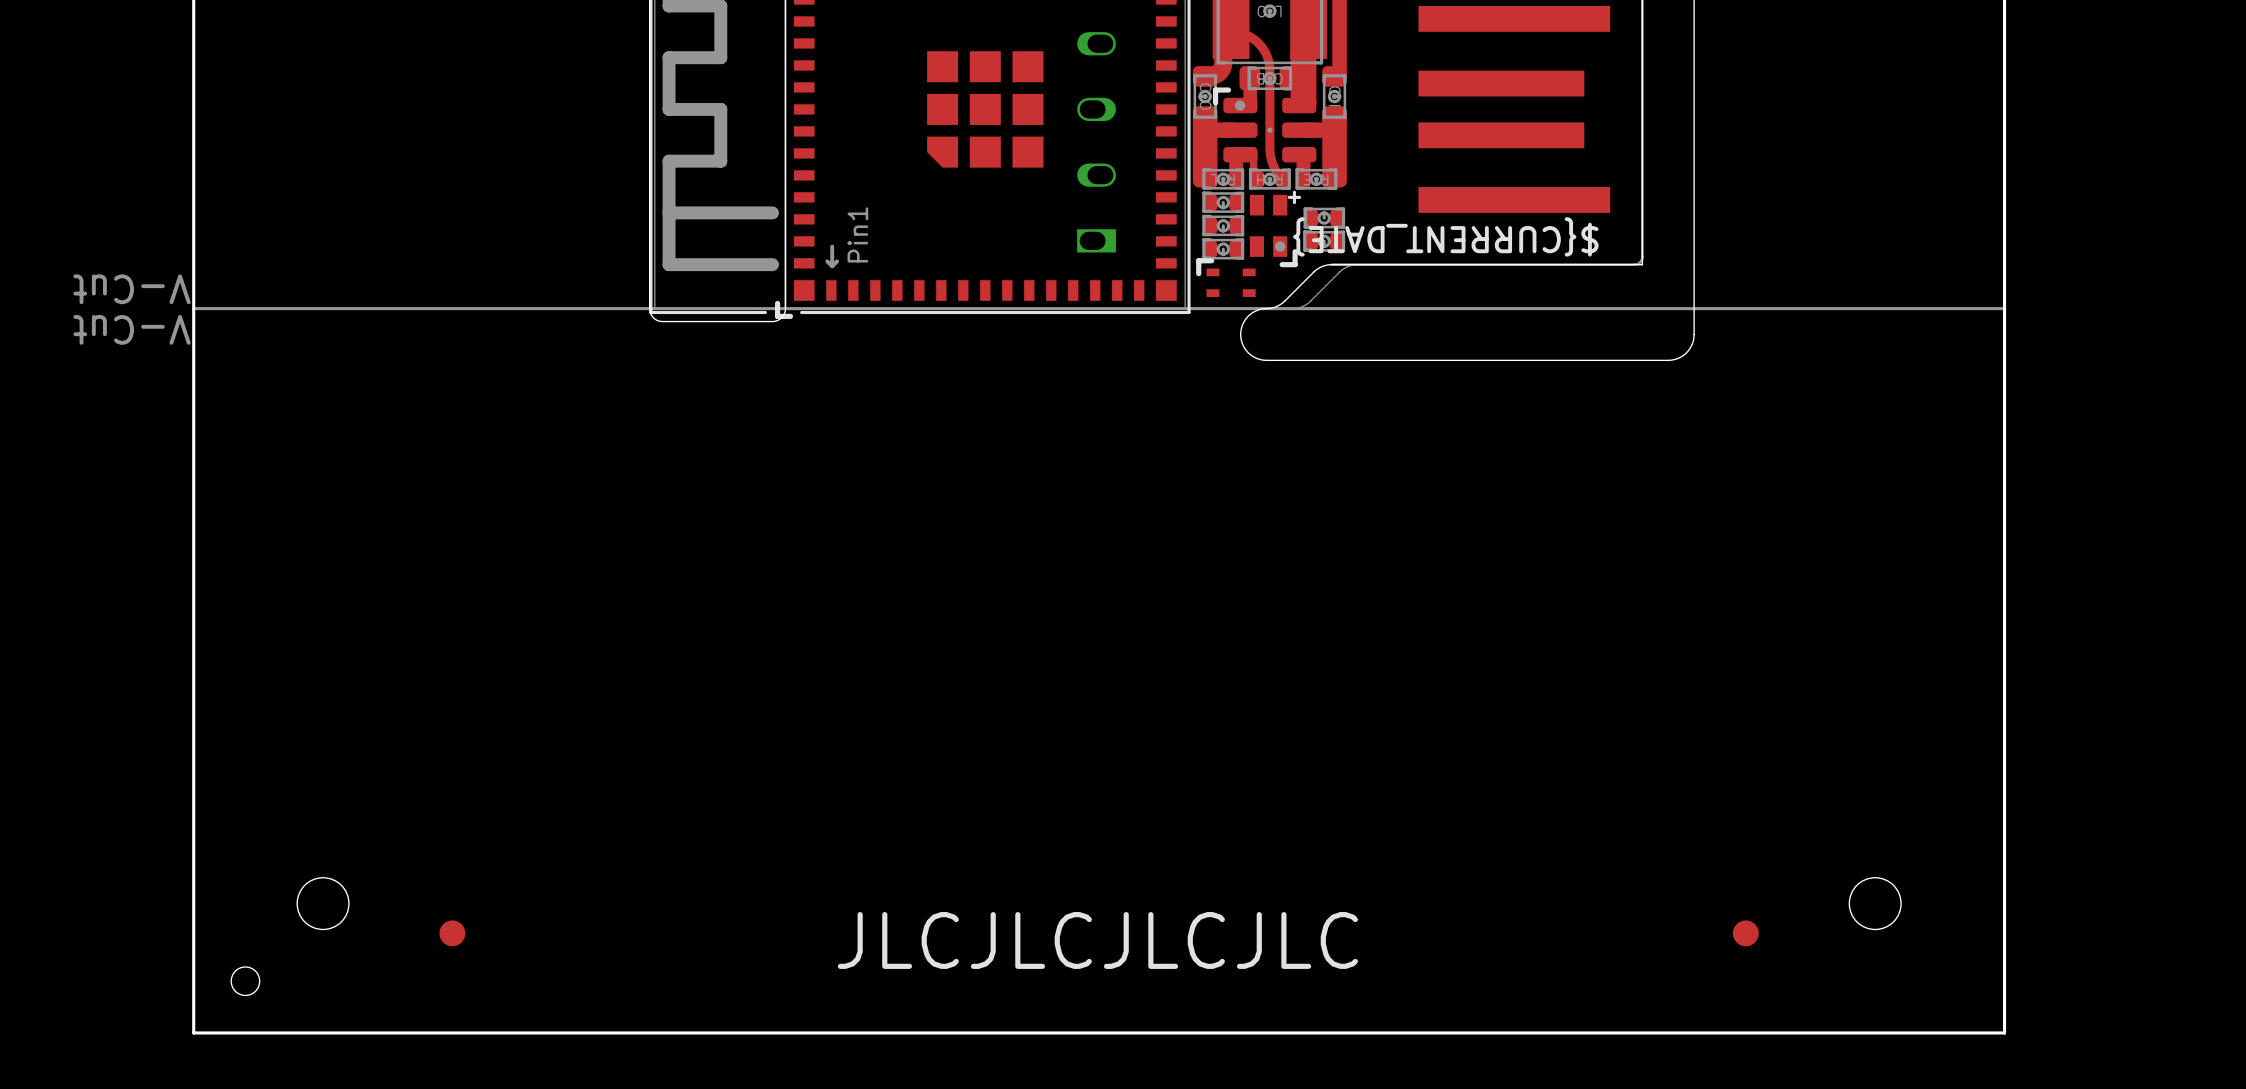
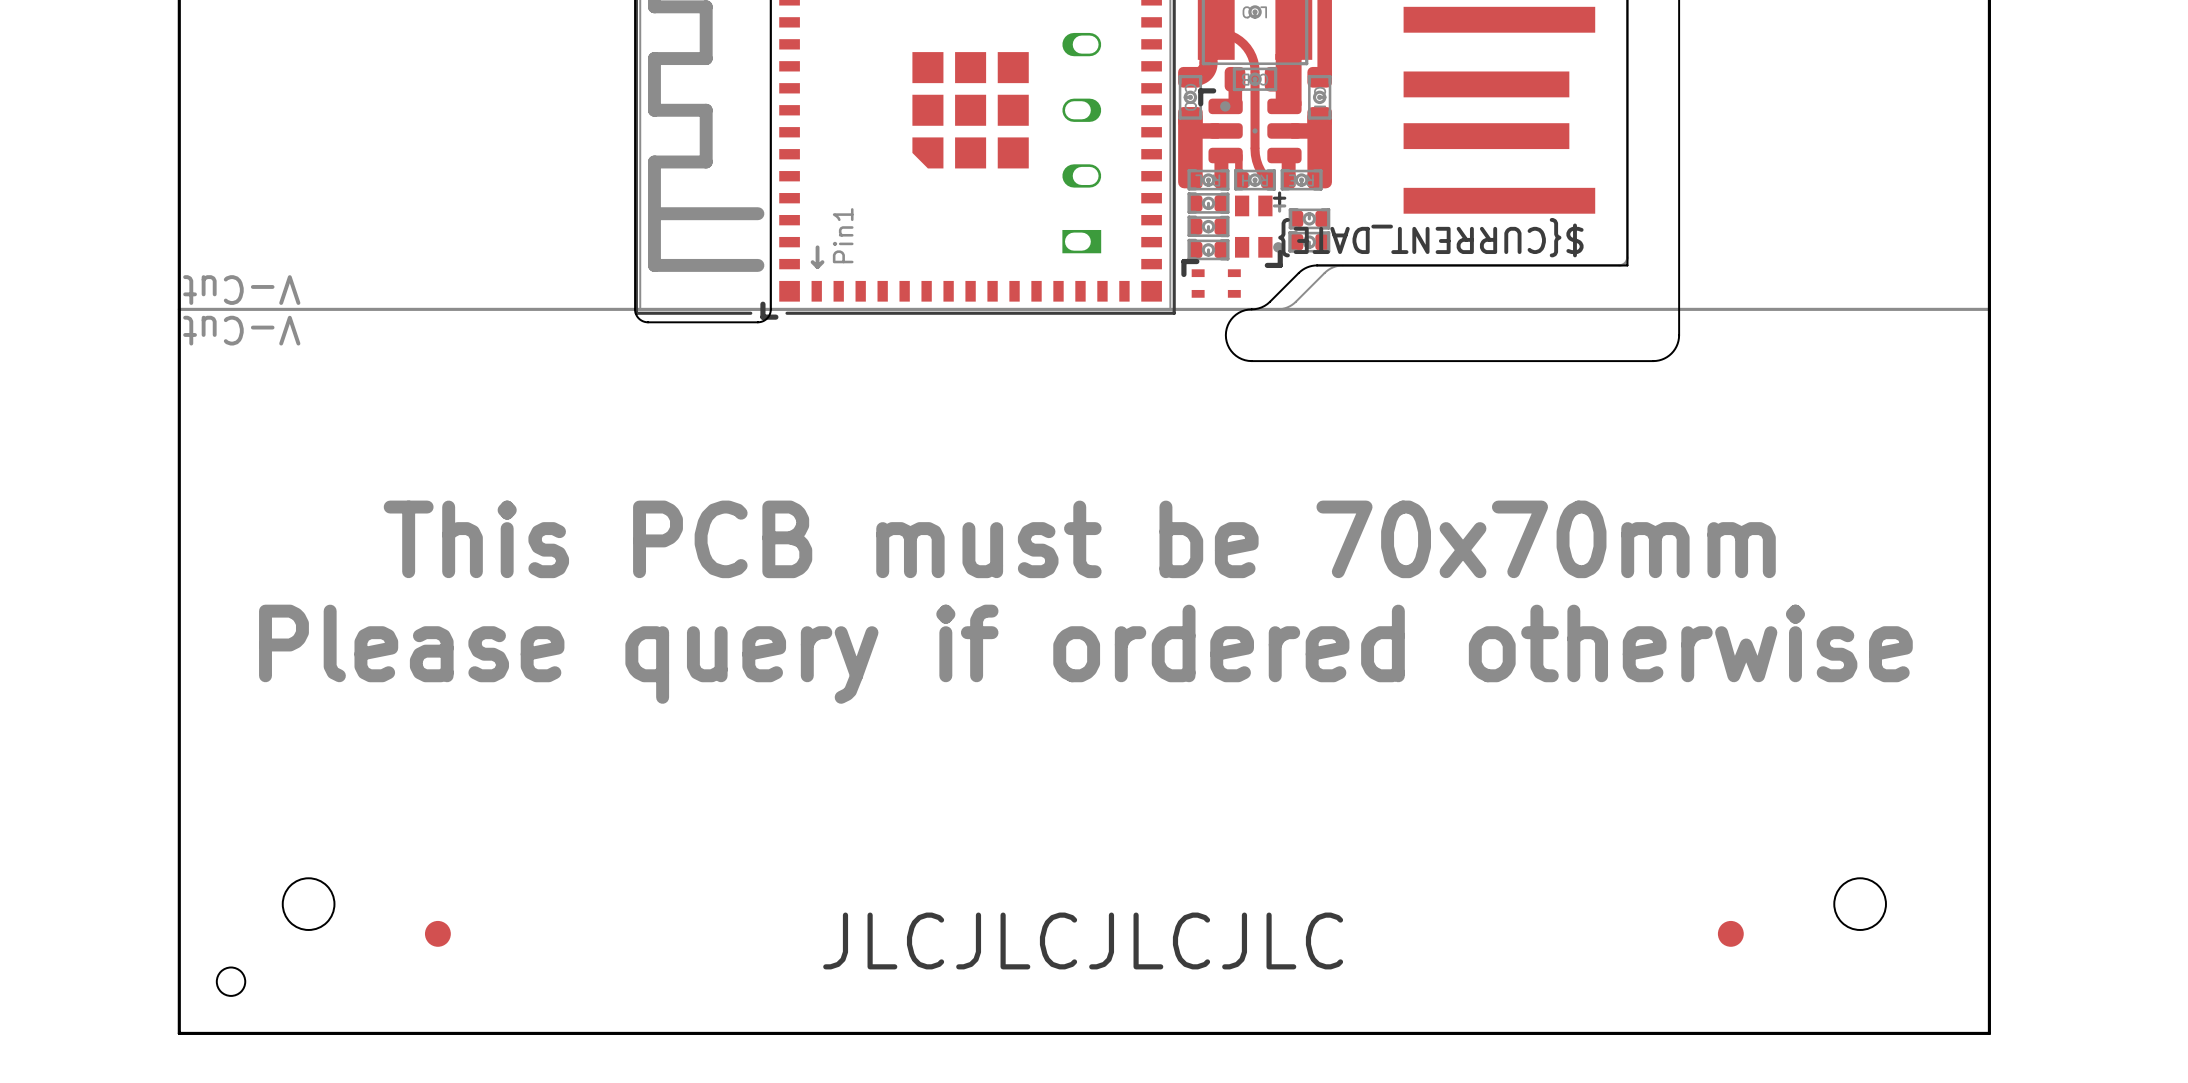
part footprint: [1249, 190, 1302, 268] -> [1234, 191, 1287, 269]
drawing shape: [73, 274, 2007, 345] -> [177, 275, 1991, 346]
text: none -> This PCB must be 70x70mm (1079, 539)
text: none -> Please query if ordered otherwise (1085, 654)

